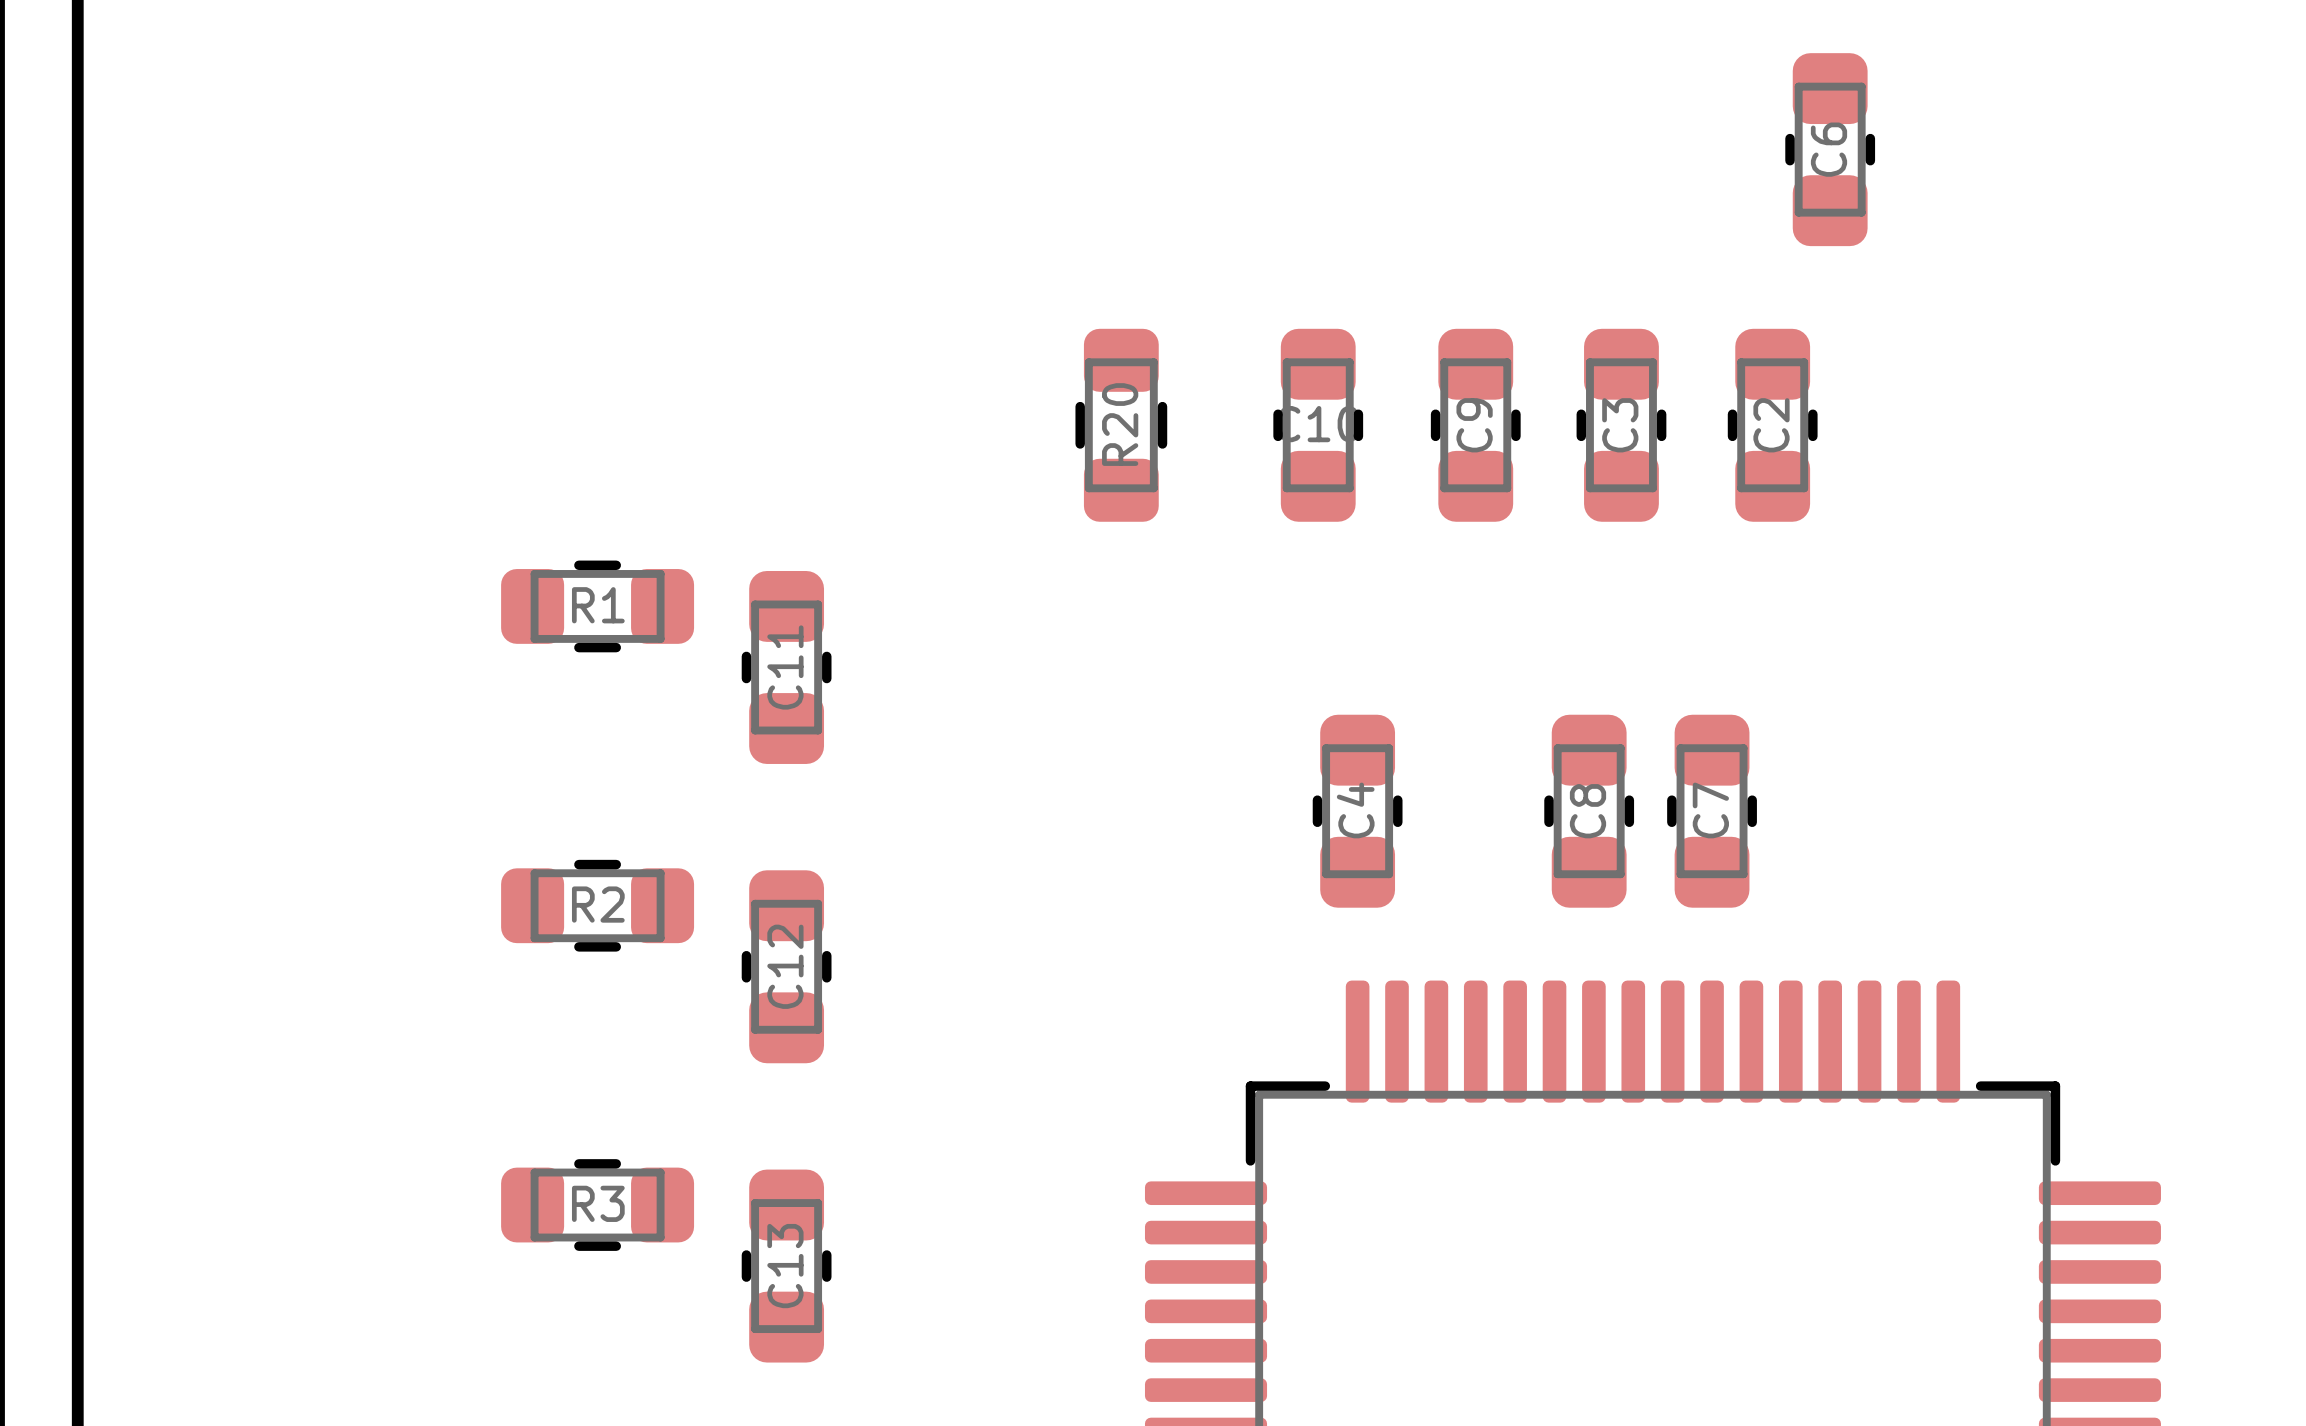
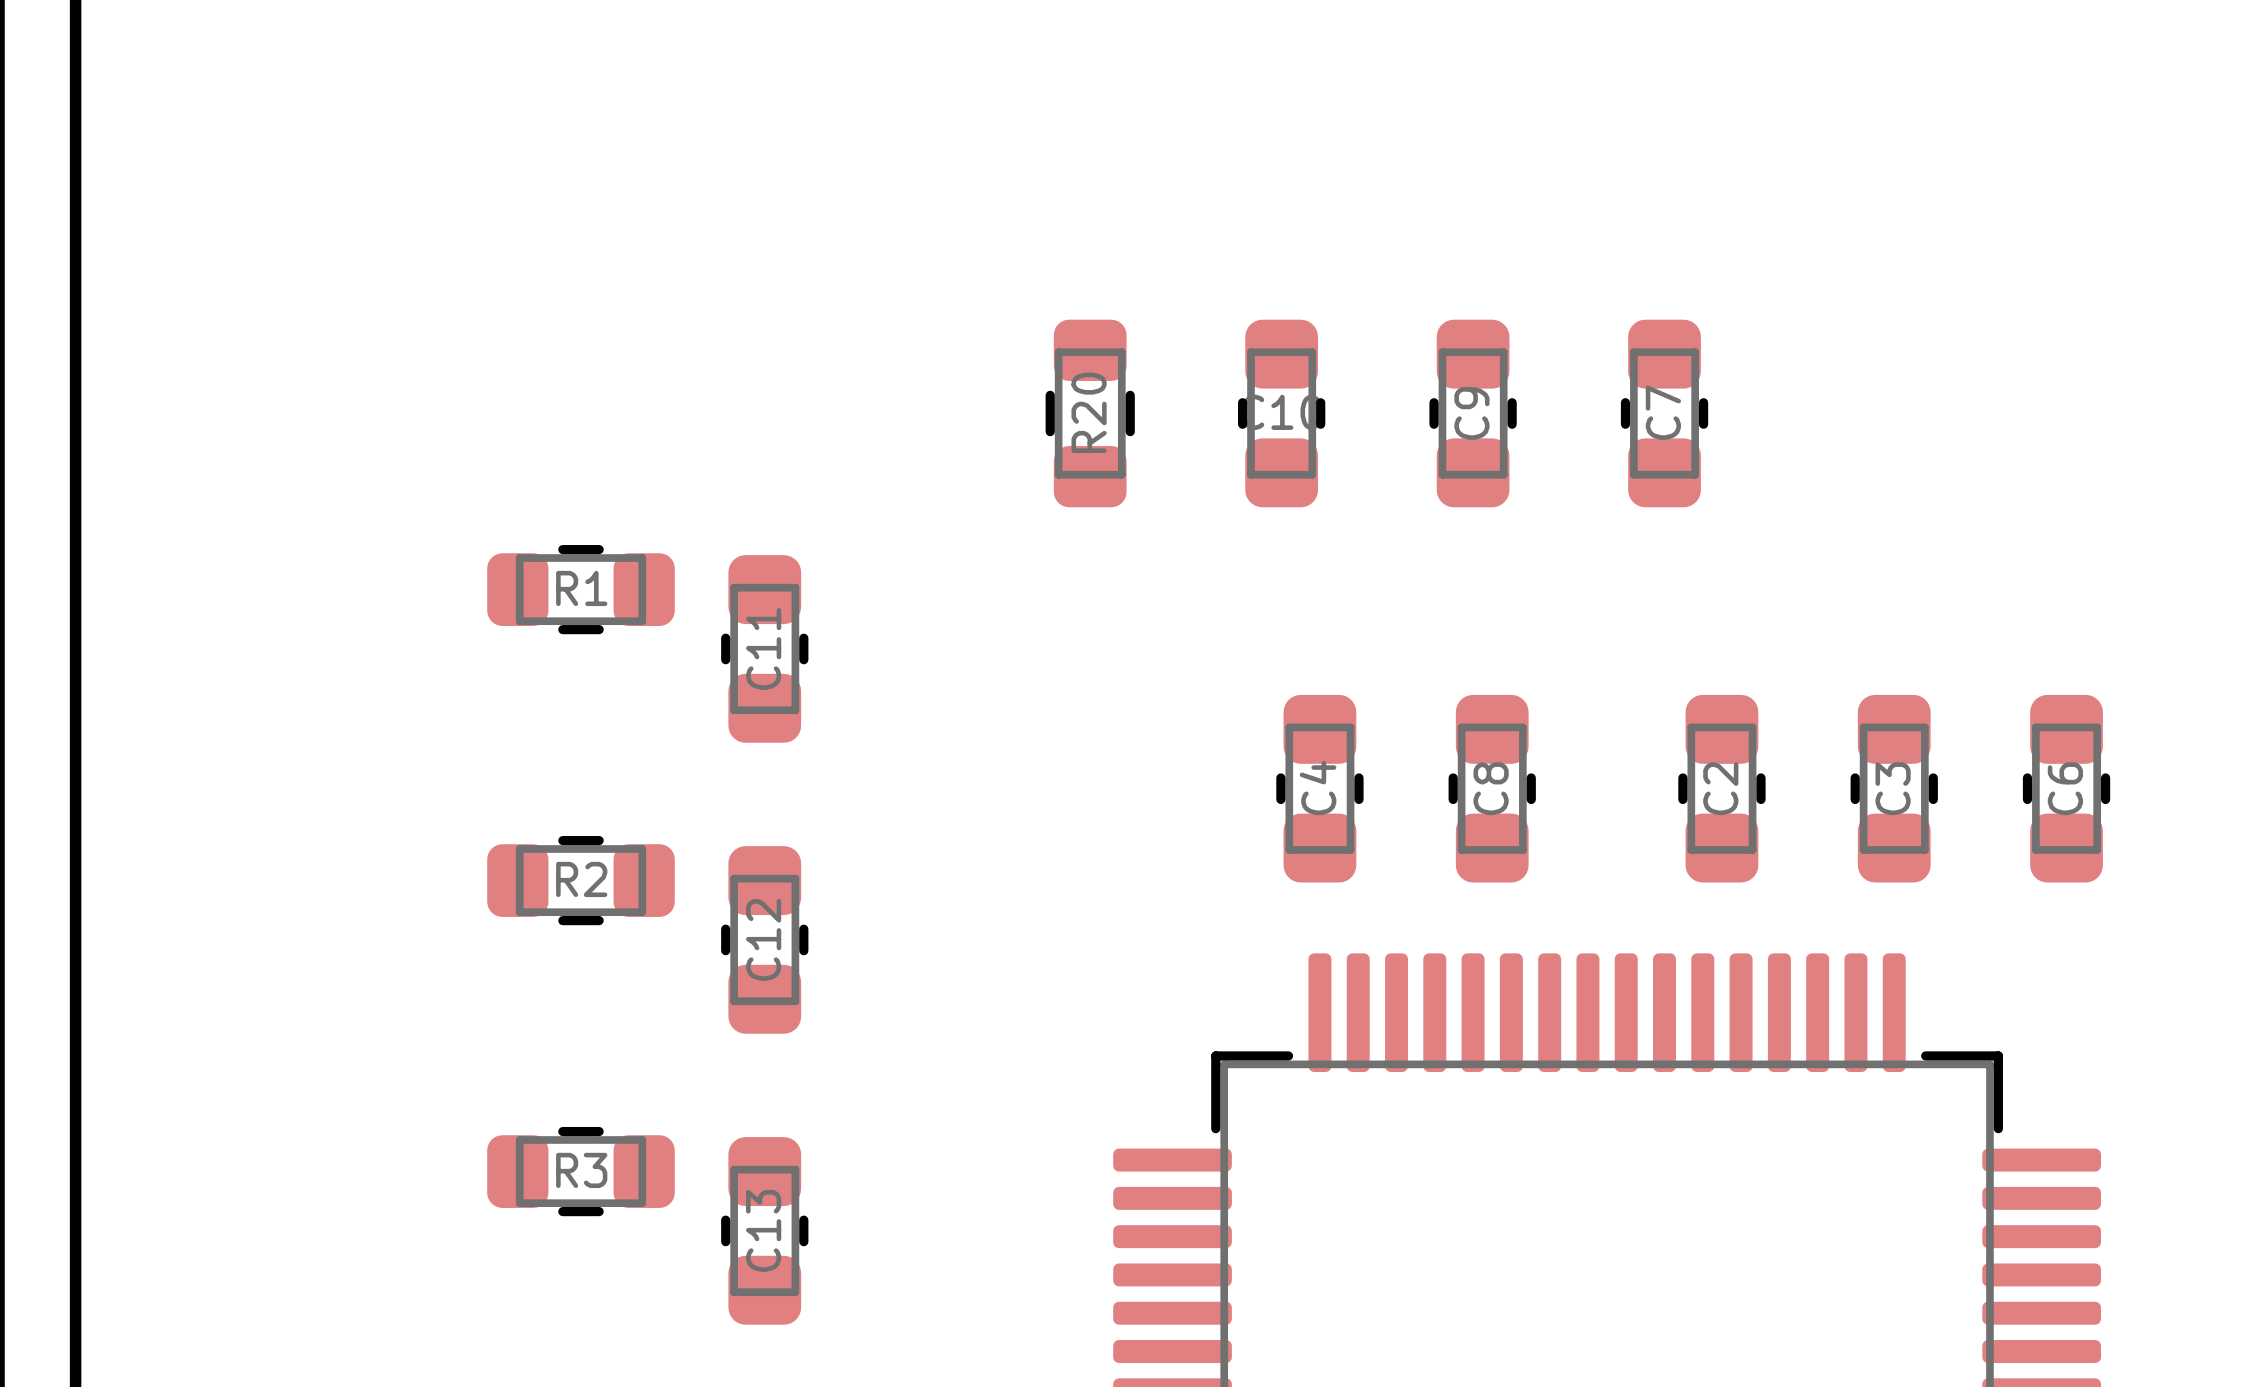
C6 position: (1830, 149) -> (2066, 788)
C9 position: (1475, 425) -> (1473, 413)
C3 position: (1621, 425) -> (1894, 788)
C2 position: (1772, 425) -> (1721, 788)
C8 position: (1589, 811) -> (1492, 788)
C7 position: (1712, 811) -> (1664, 413)

